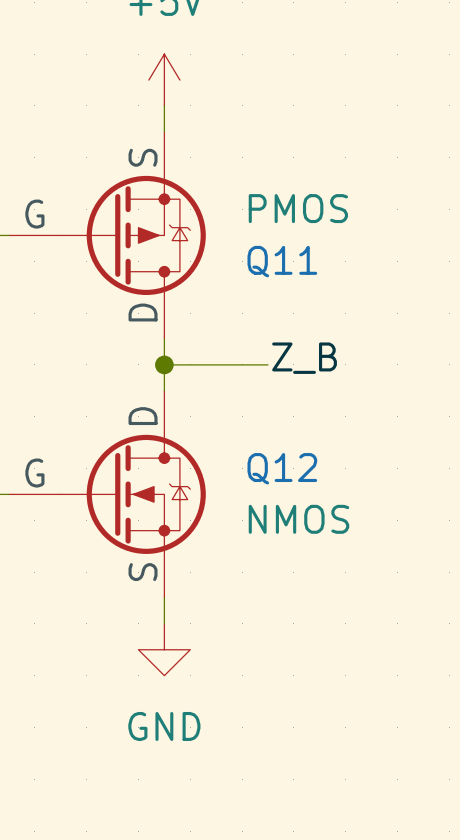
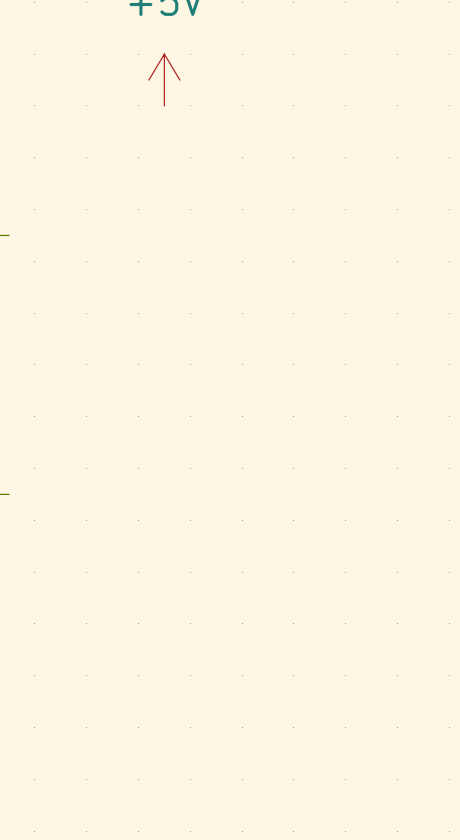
wire: (164, 105) (164, 131) -> none
Q11: PMOS (107, 235) -> none
wire: (164, 339) (164, 390) -> none
label: Z_B (304, 358) -> none
wire: (164, 364) (267, 364) -> none
junction: (164, 364) -> none
Q12: NMOS (107, 494) -> none
wire: (164, 597) (164, 623) -> none
power symbol: GND (164, 649) -> none

